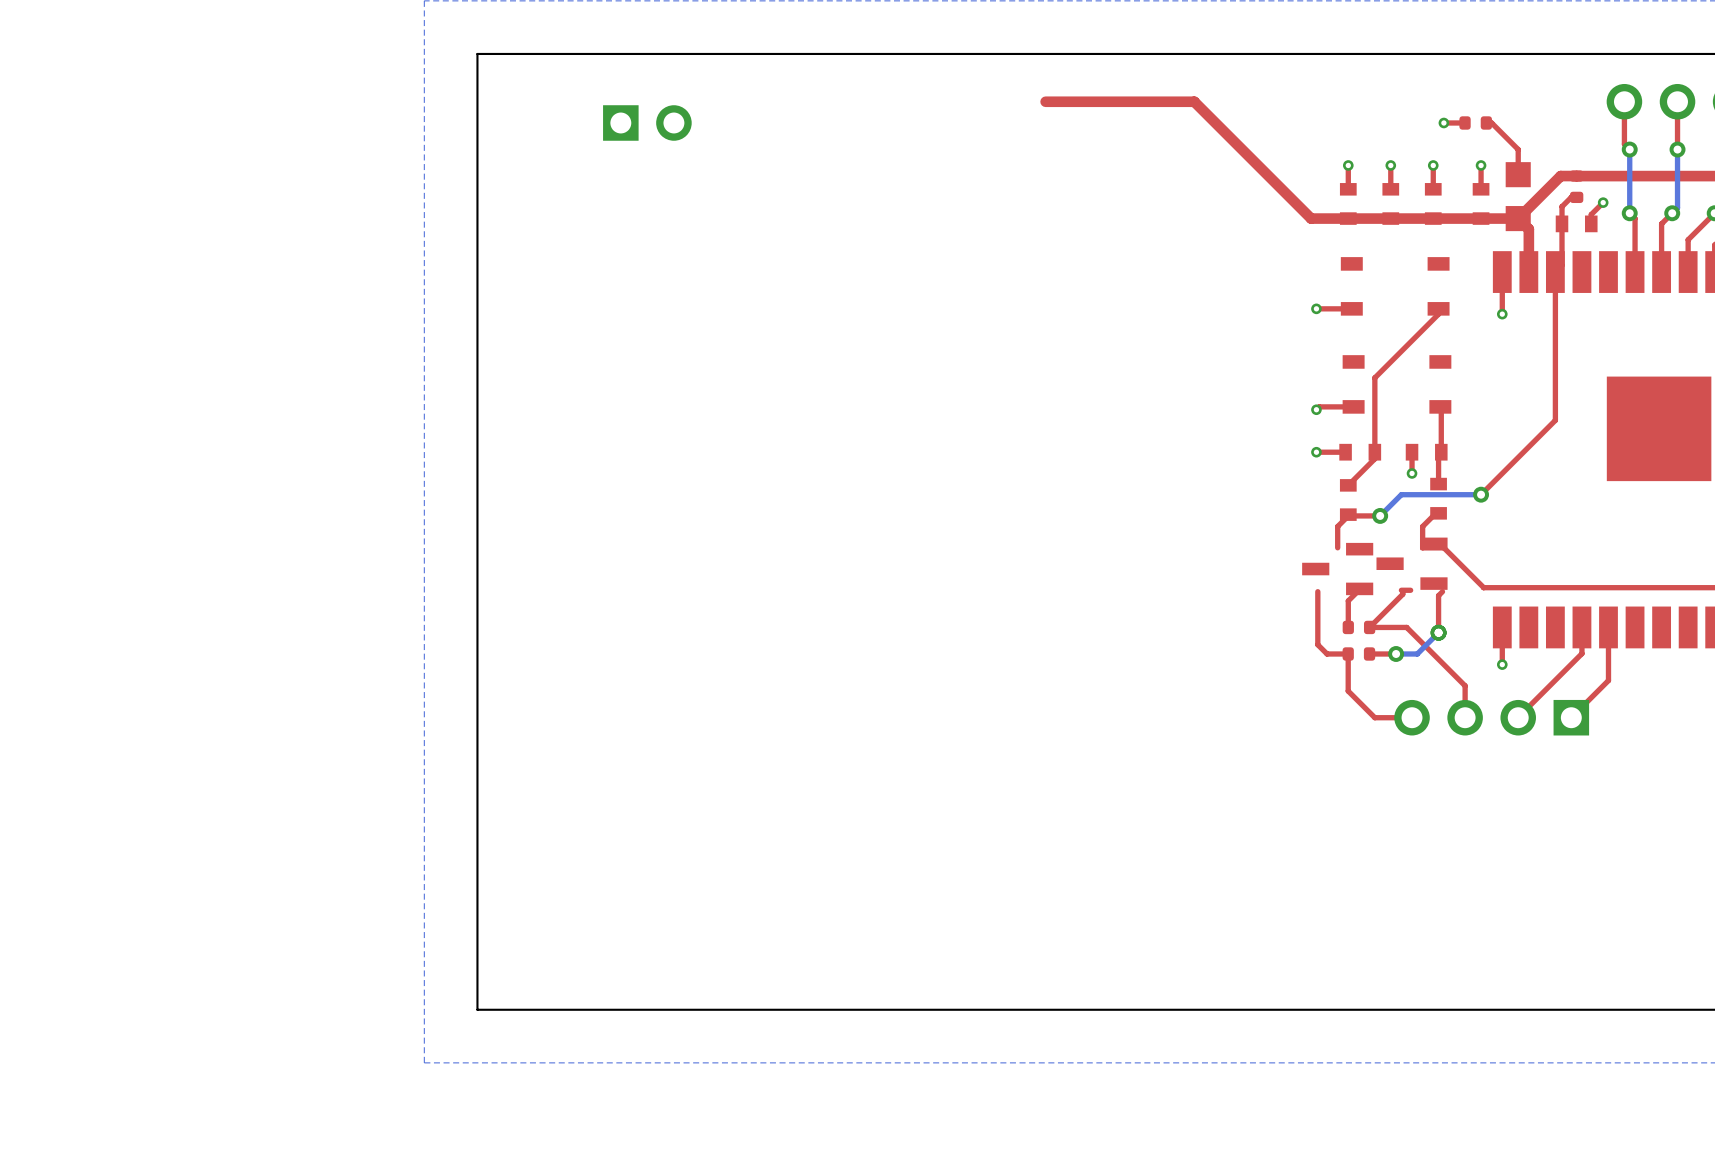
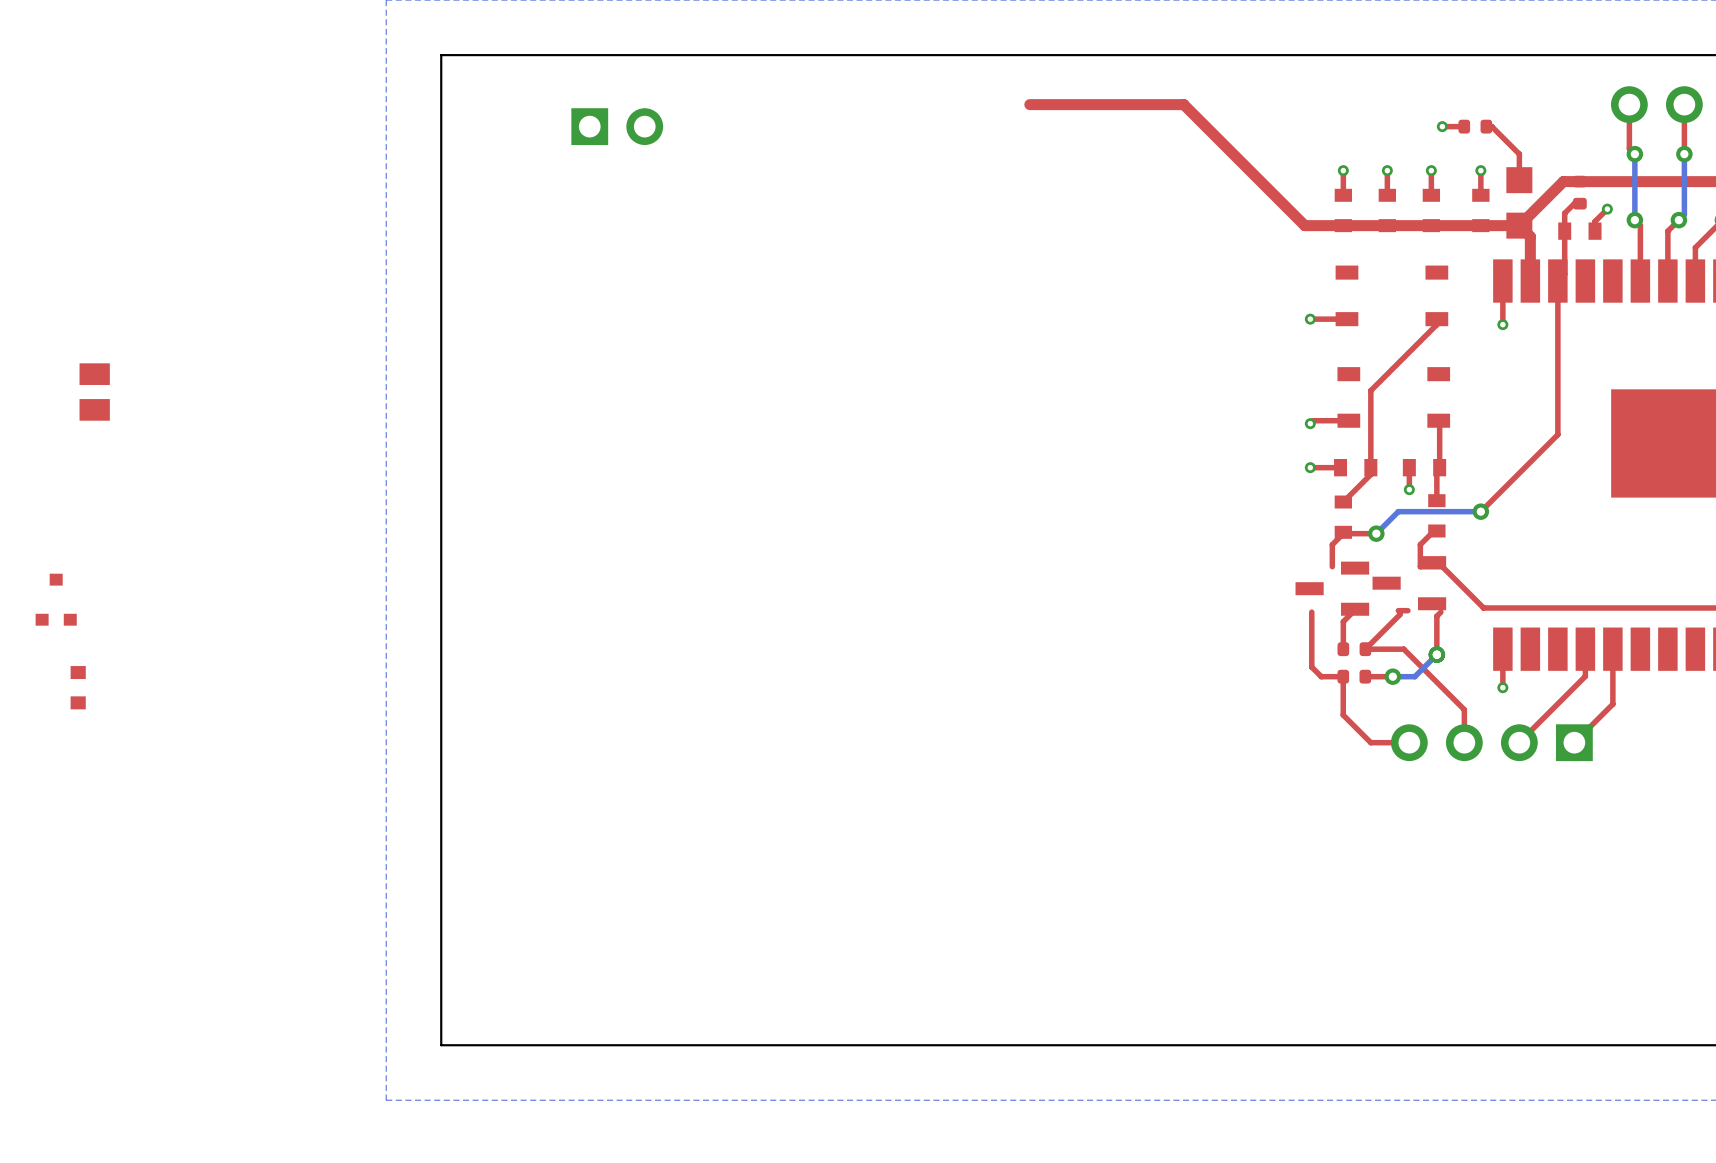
part: none -> (94, 392)
part: none -> (56, 599)
part: none -> (78, 687)

